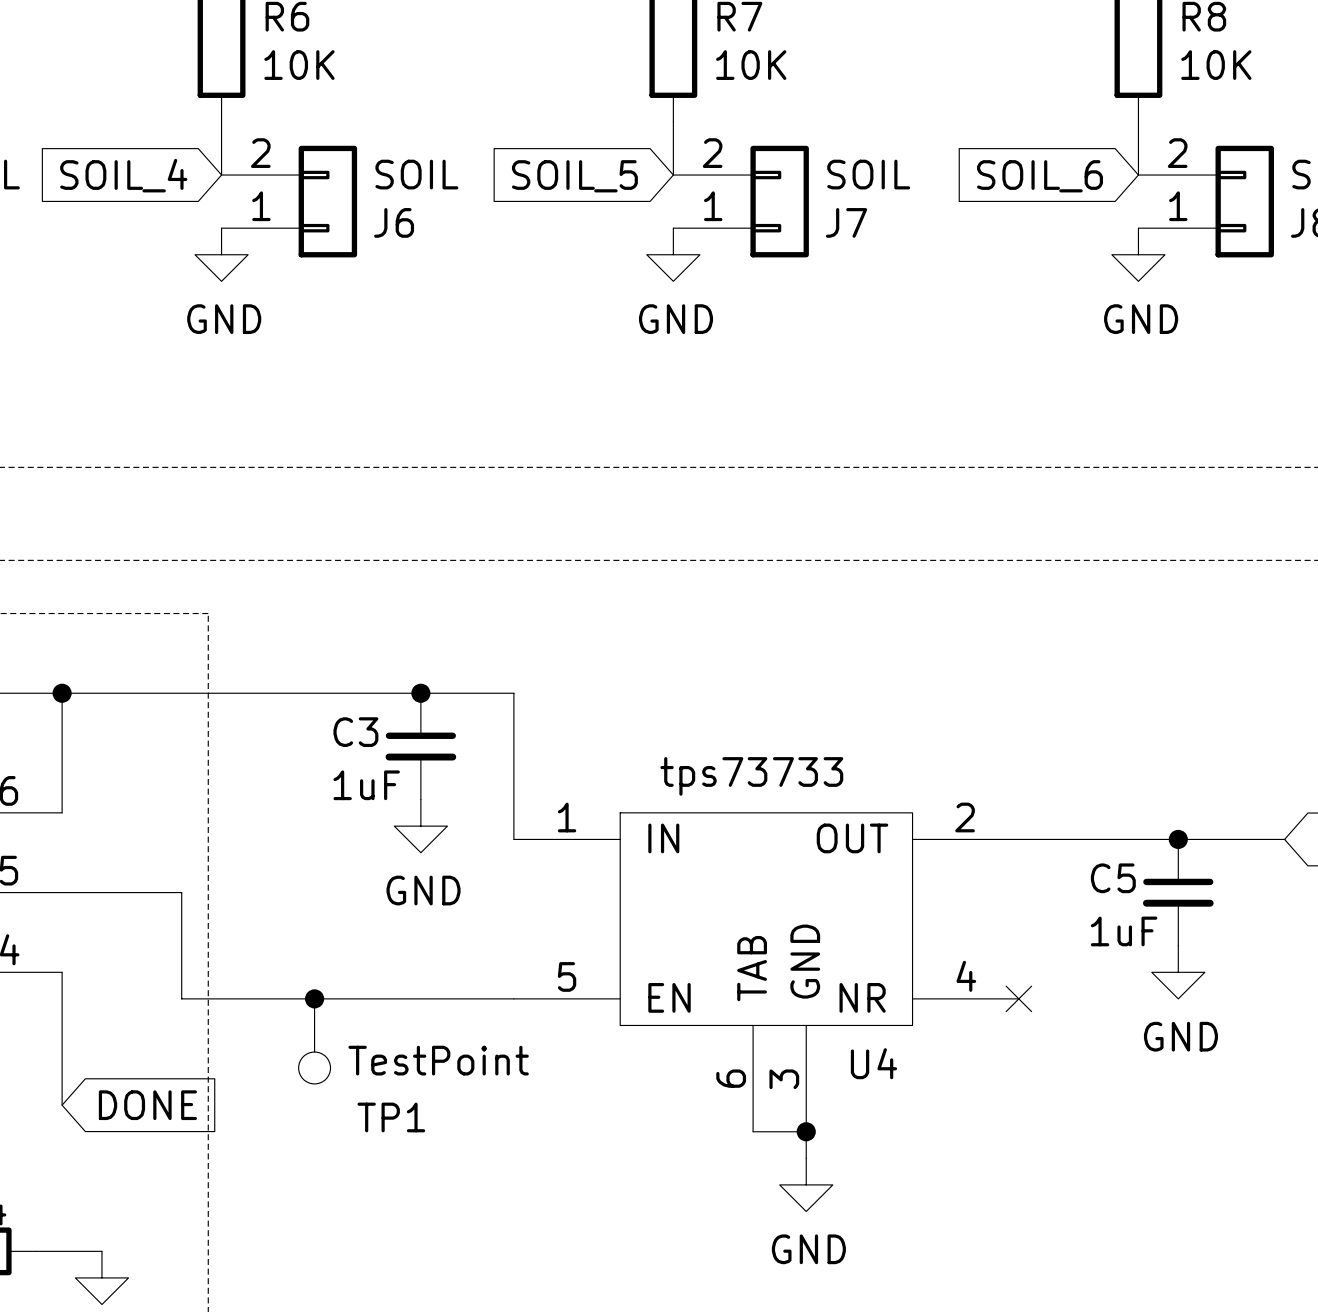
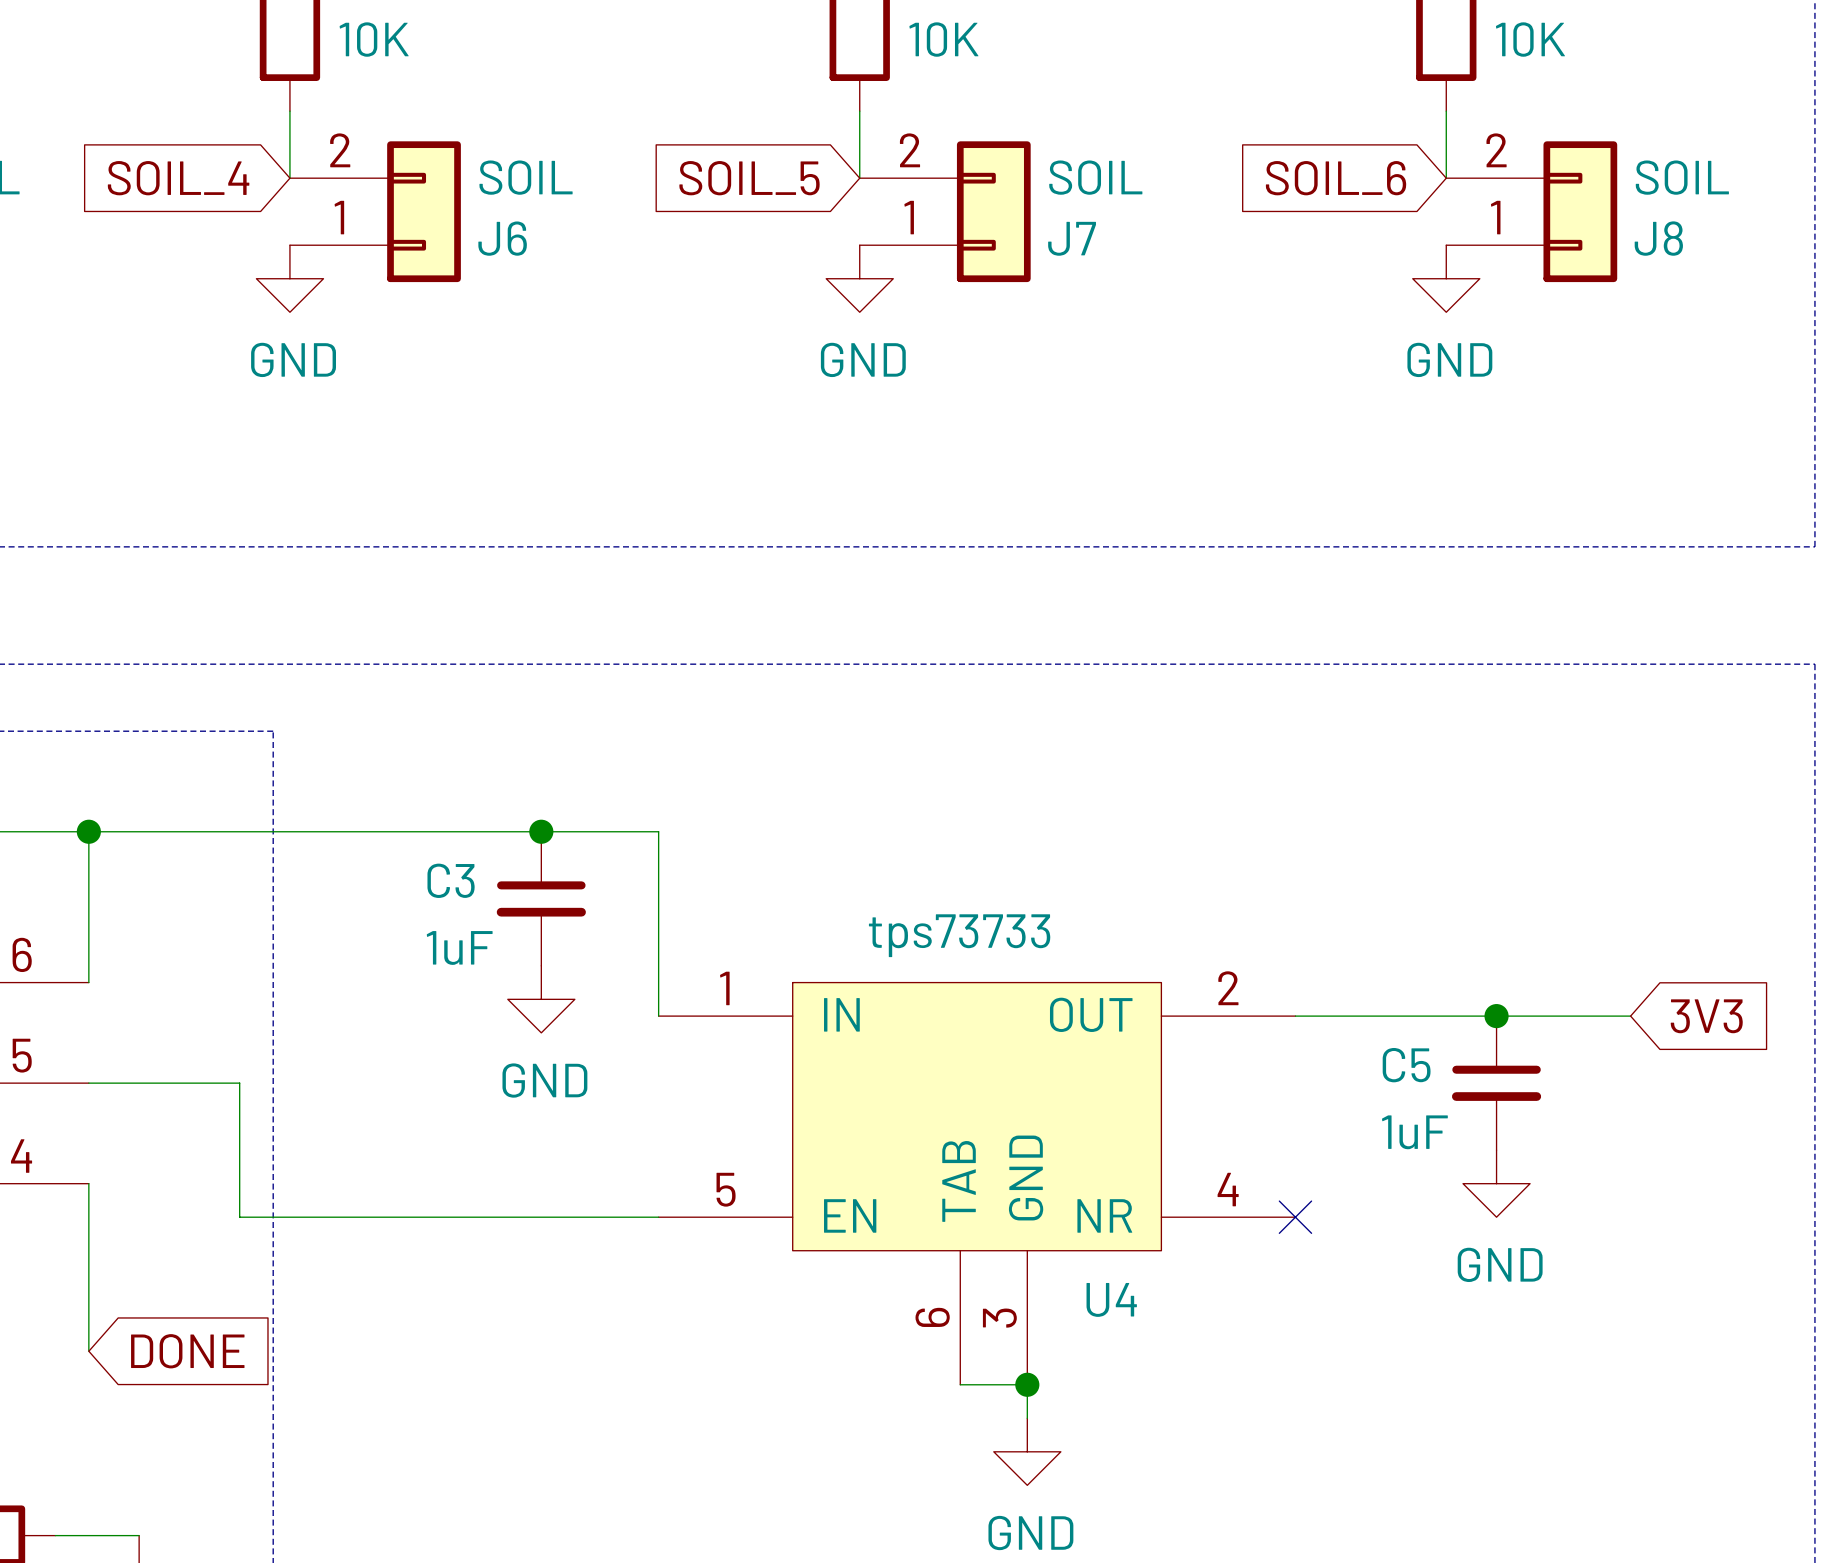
junction: (314, 998) -> none
TP1: TestPoint (314, 1041) -> none

